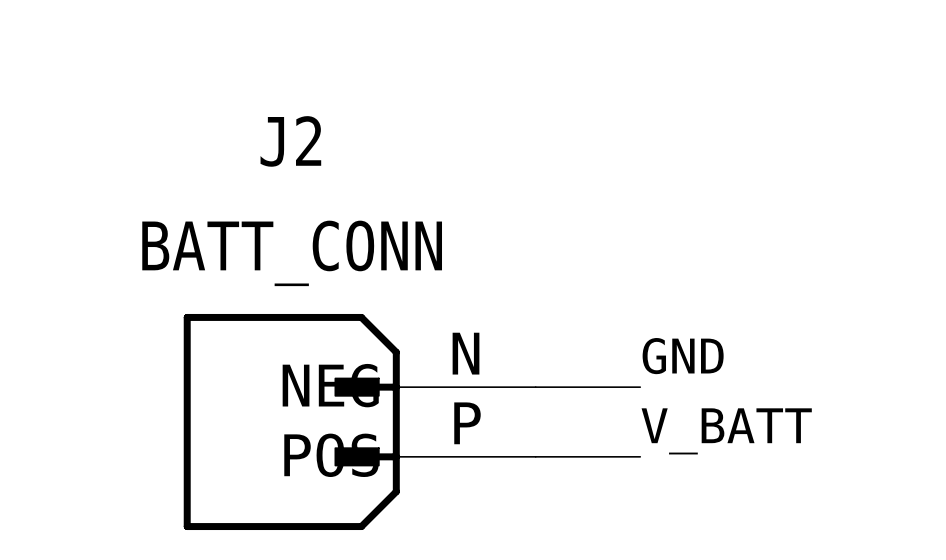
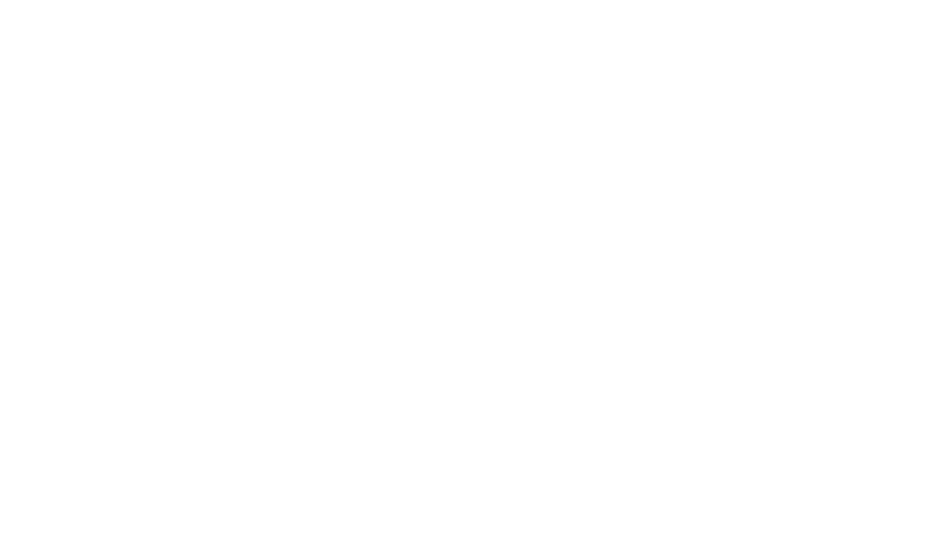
label: GND (683, 356) -> none
wire: (535, 387) (640, 387) -> none
J2: BATT_CONN (359, 422) -> none
label: V_BATT (726, 431) -> none
wire: (535, 456) (640, 456) -> none

